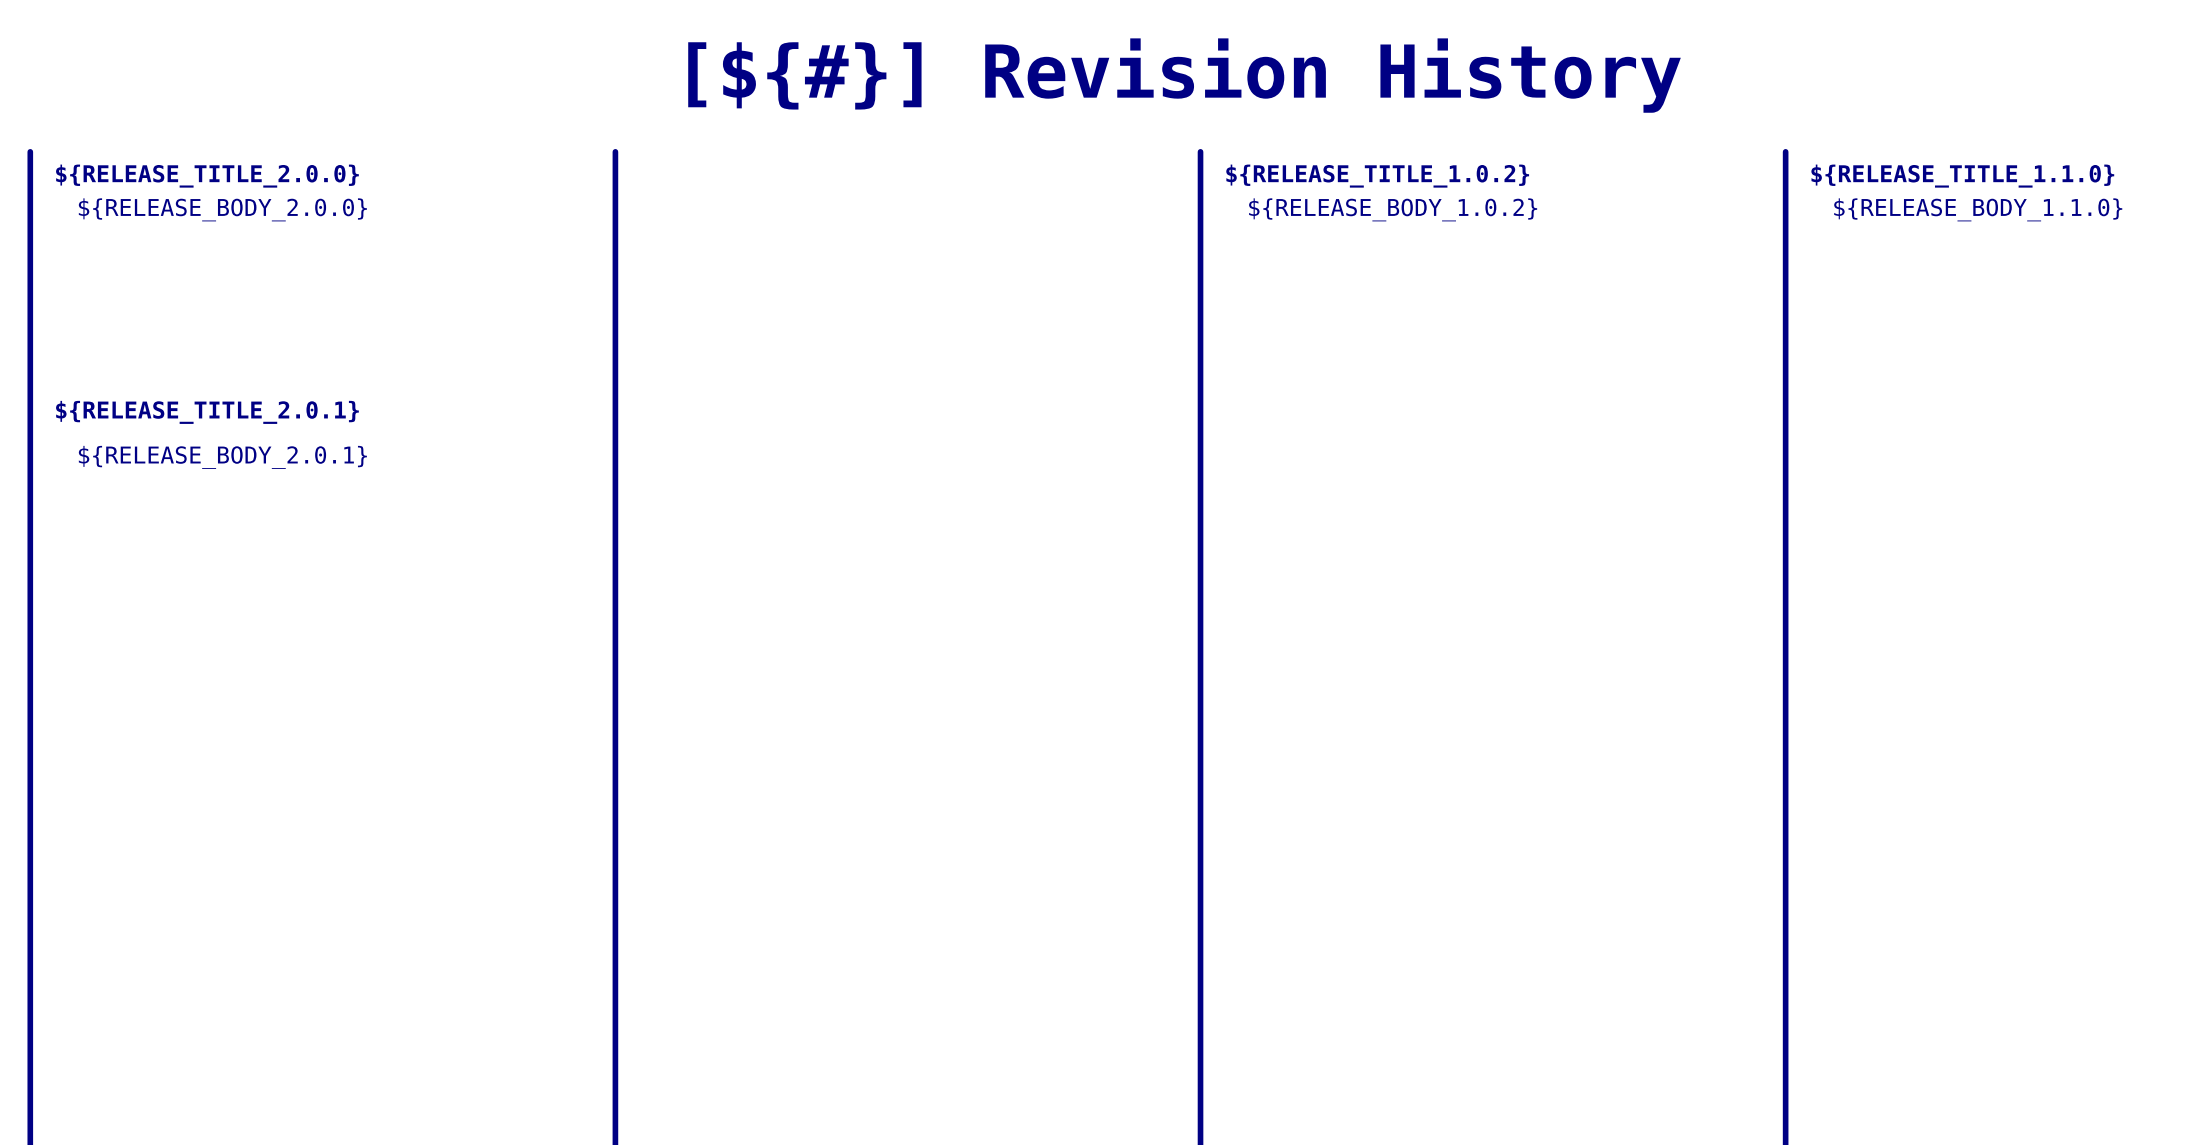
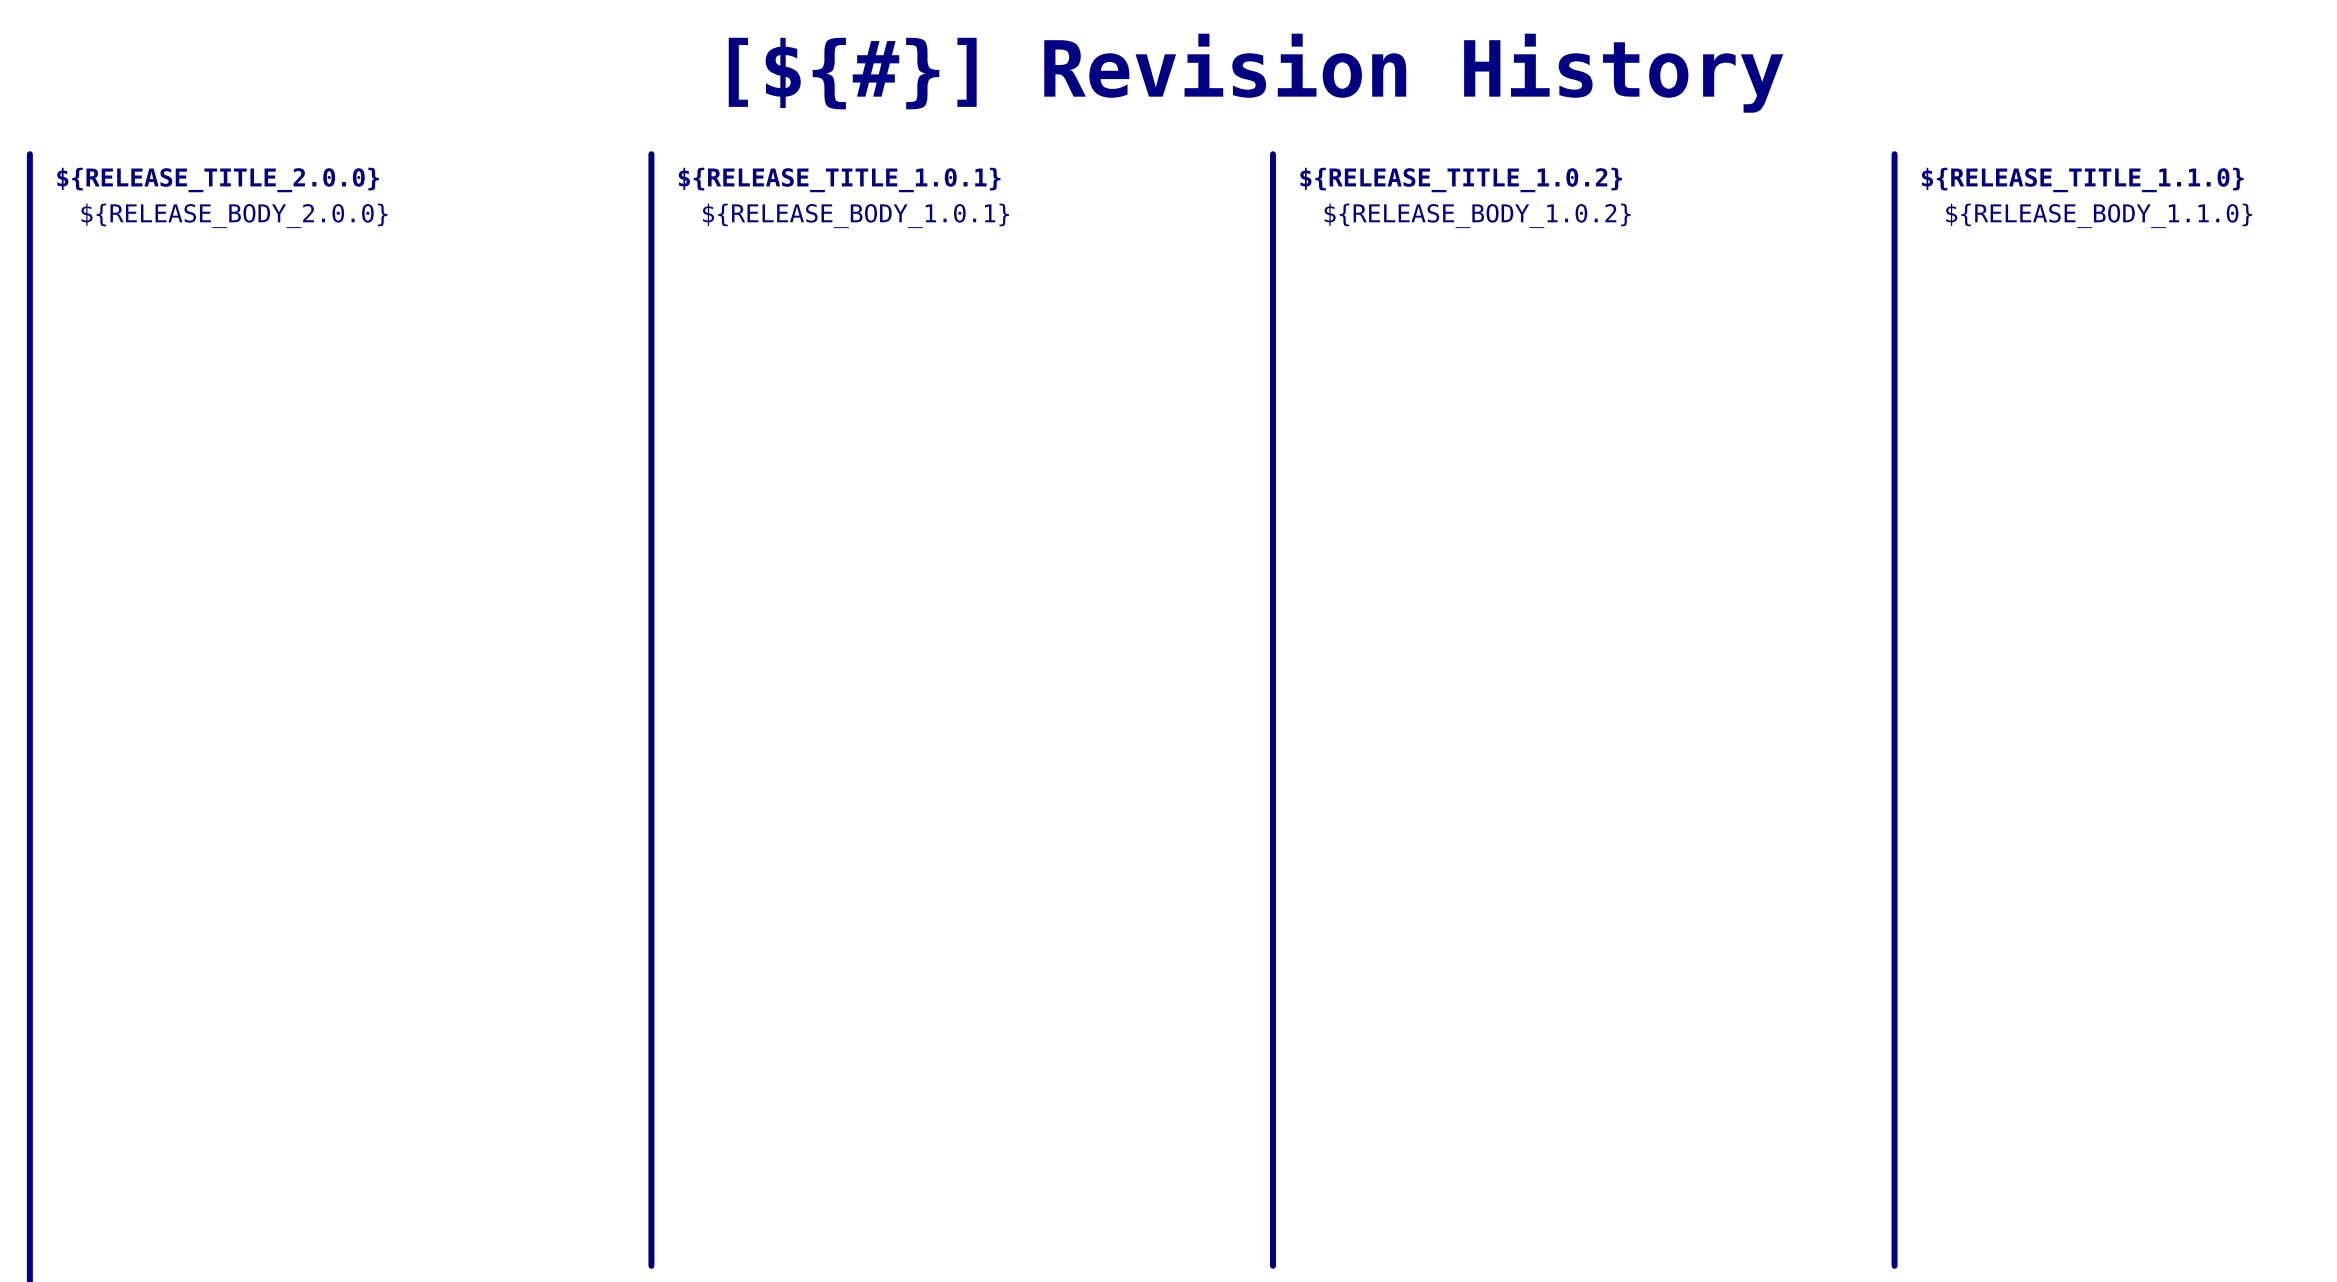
text: none -> ${RELEASE_TITLE_1.0.1} (839, 179)
text: none -> ${RELEASE_BODY_1.0.1} (856, 215)
text: ${RELEASE_TITLE_2.0.1} (207, 412) -> none
text: ${RELEASE_BODY_2.0.1} (222, 457) -> none

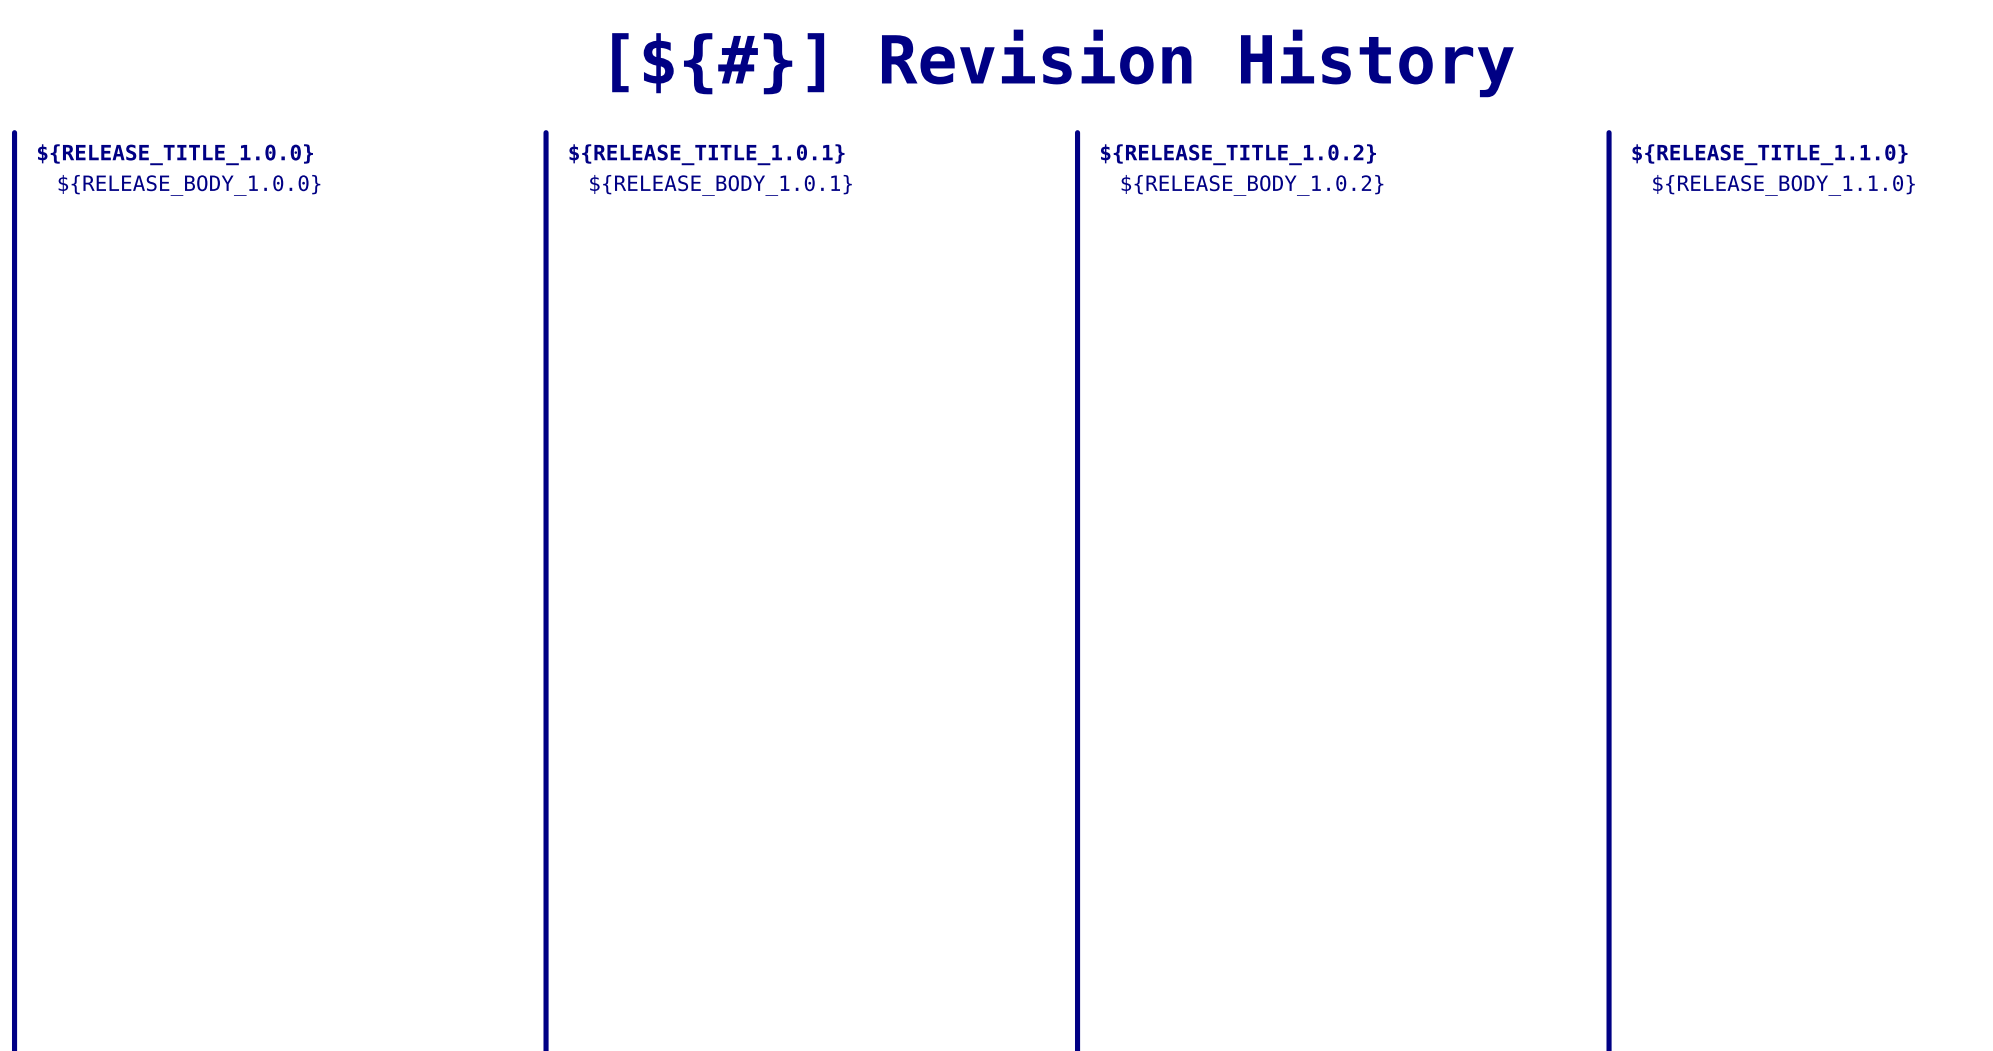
text: ${RELEASE_TITLE_2.0.0} (218, 179) -> ${RELEASE_TITLE_1.0.0} (175, 154)
text: ${RELEASE_BODY_2.0.0} (234, 215) -> ${RELEASE_BODY_1.0.0} (189, 185)

